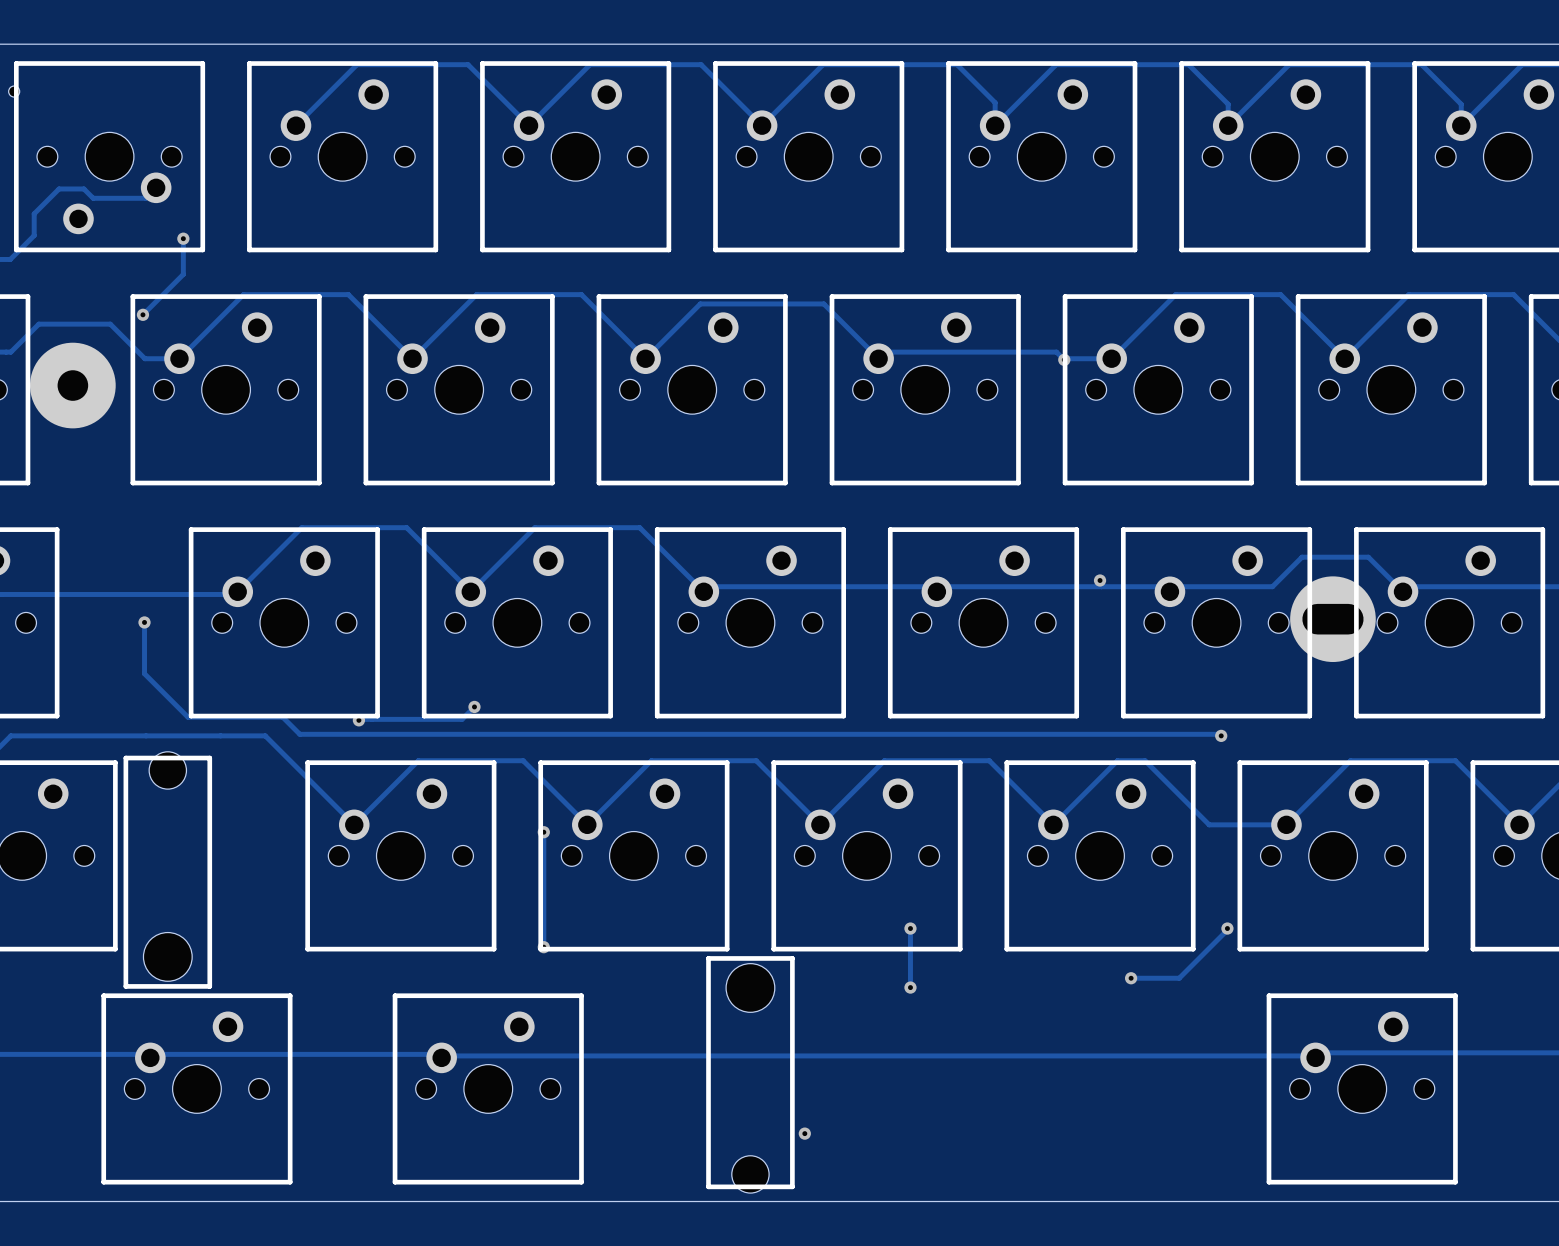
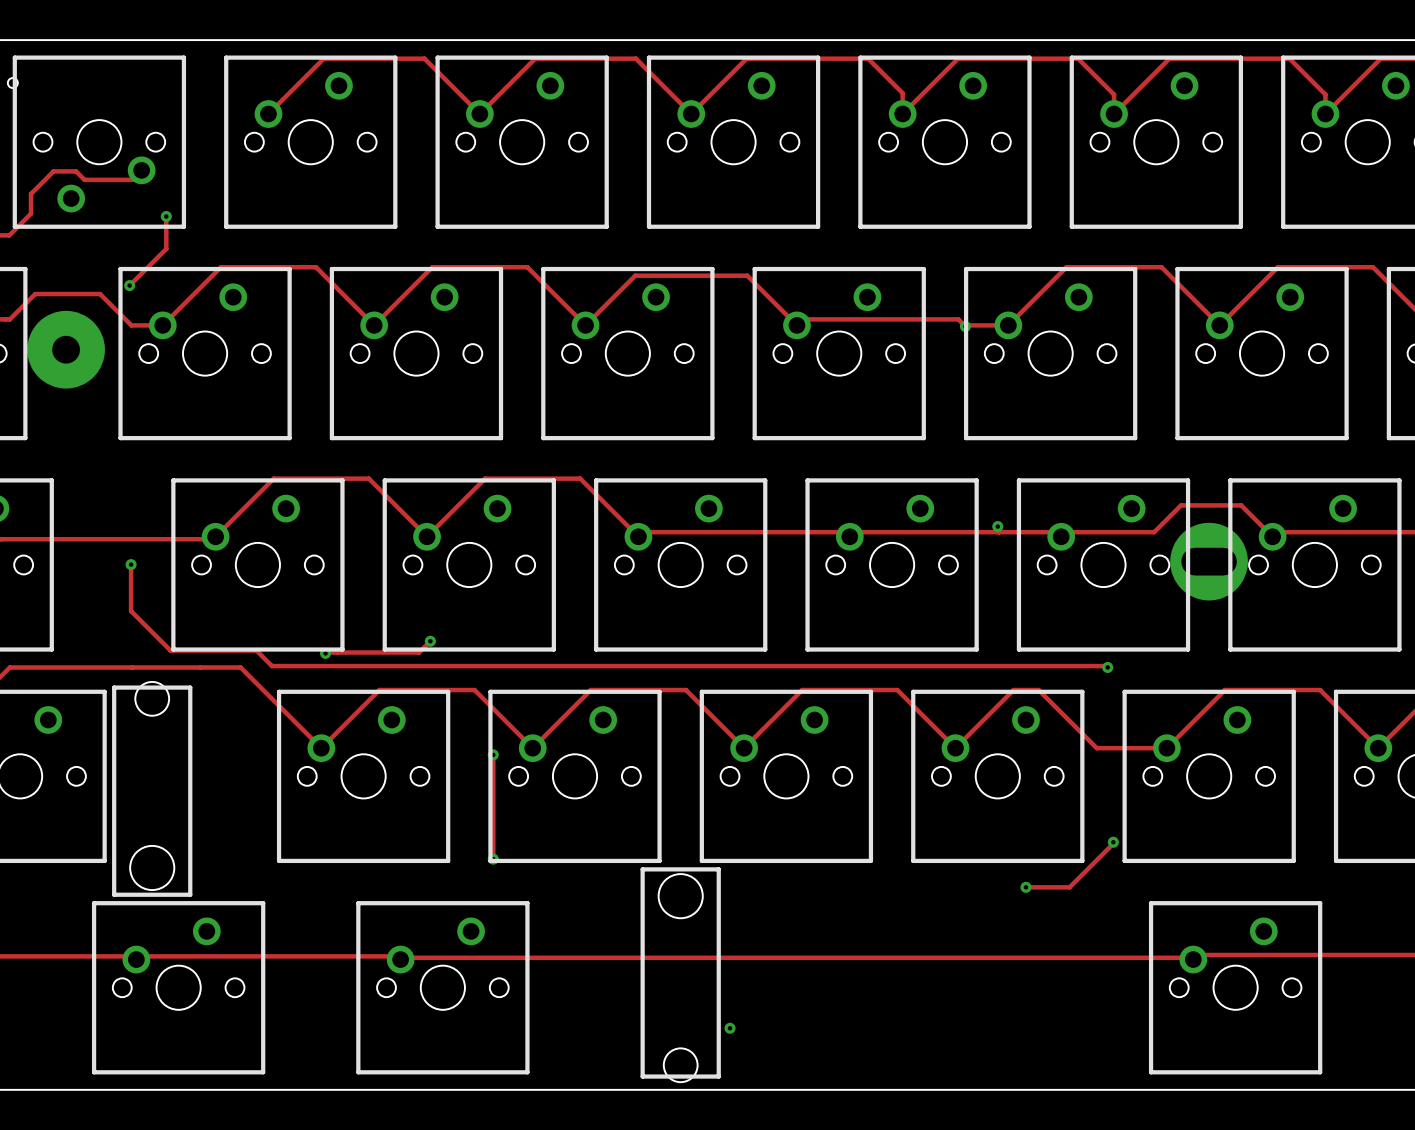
track: (910, 928) (910, 987) -> none
via: (910, 928) -> none
via: (910, 987) -> none

